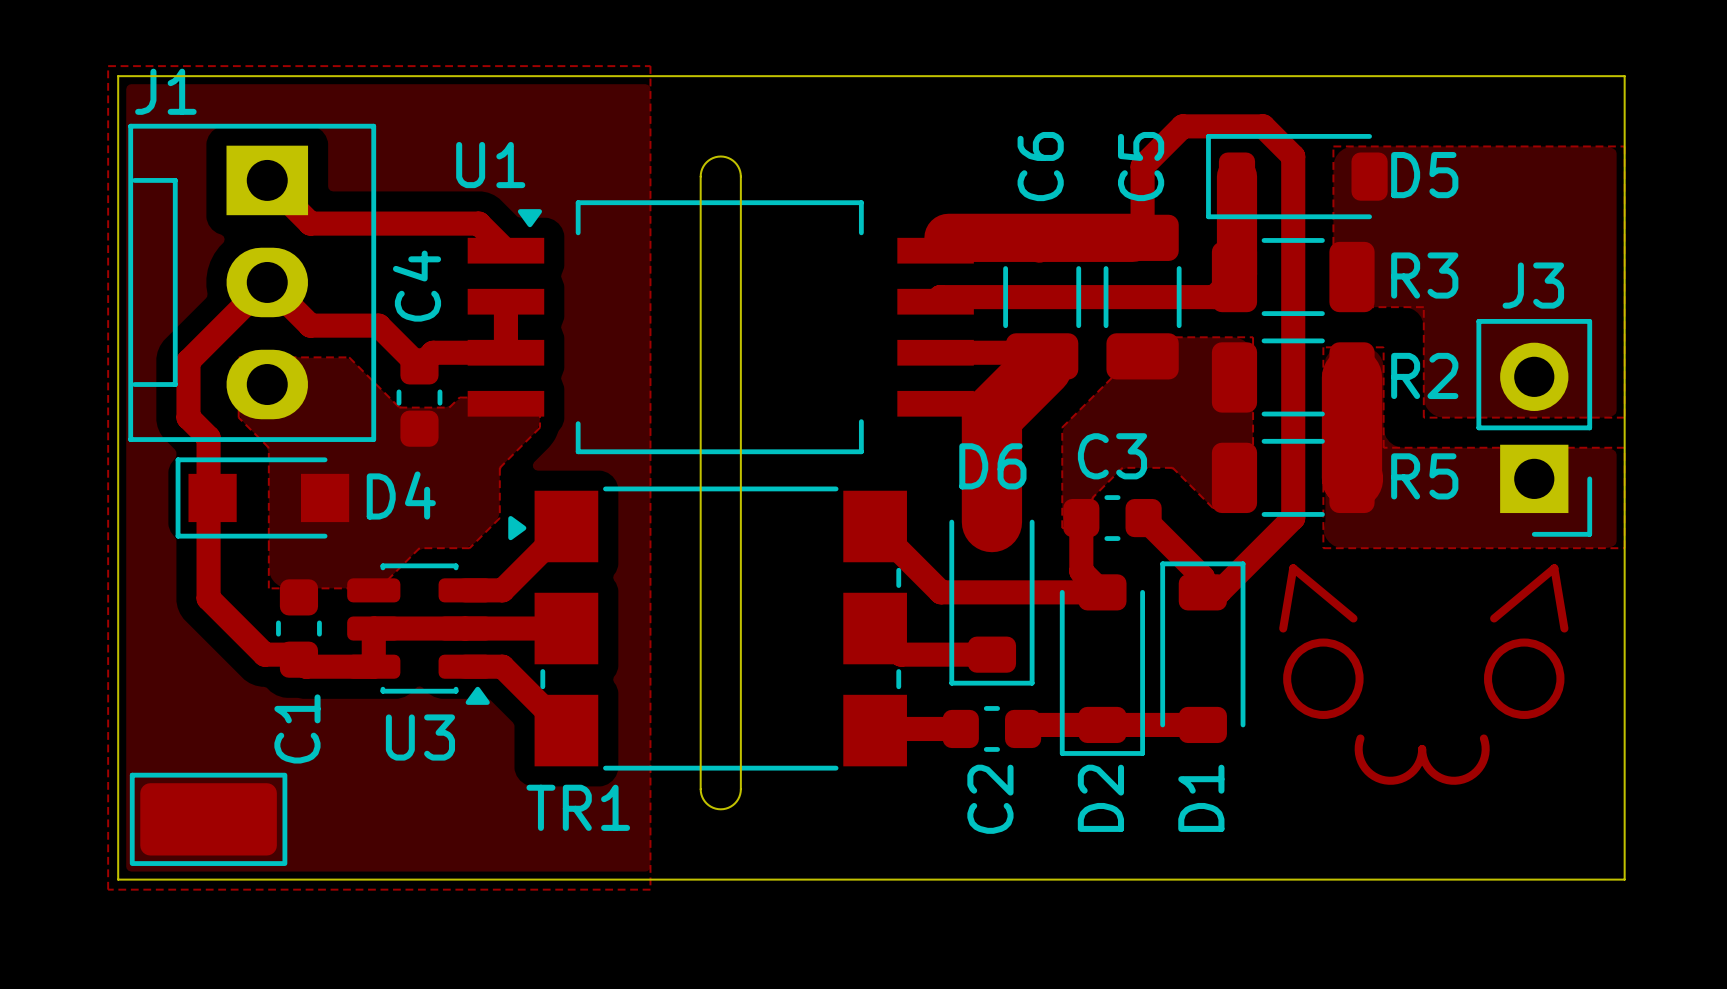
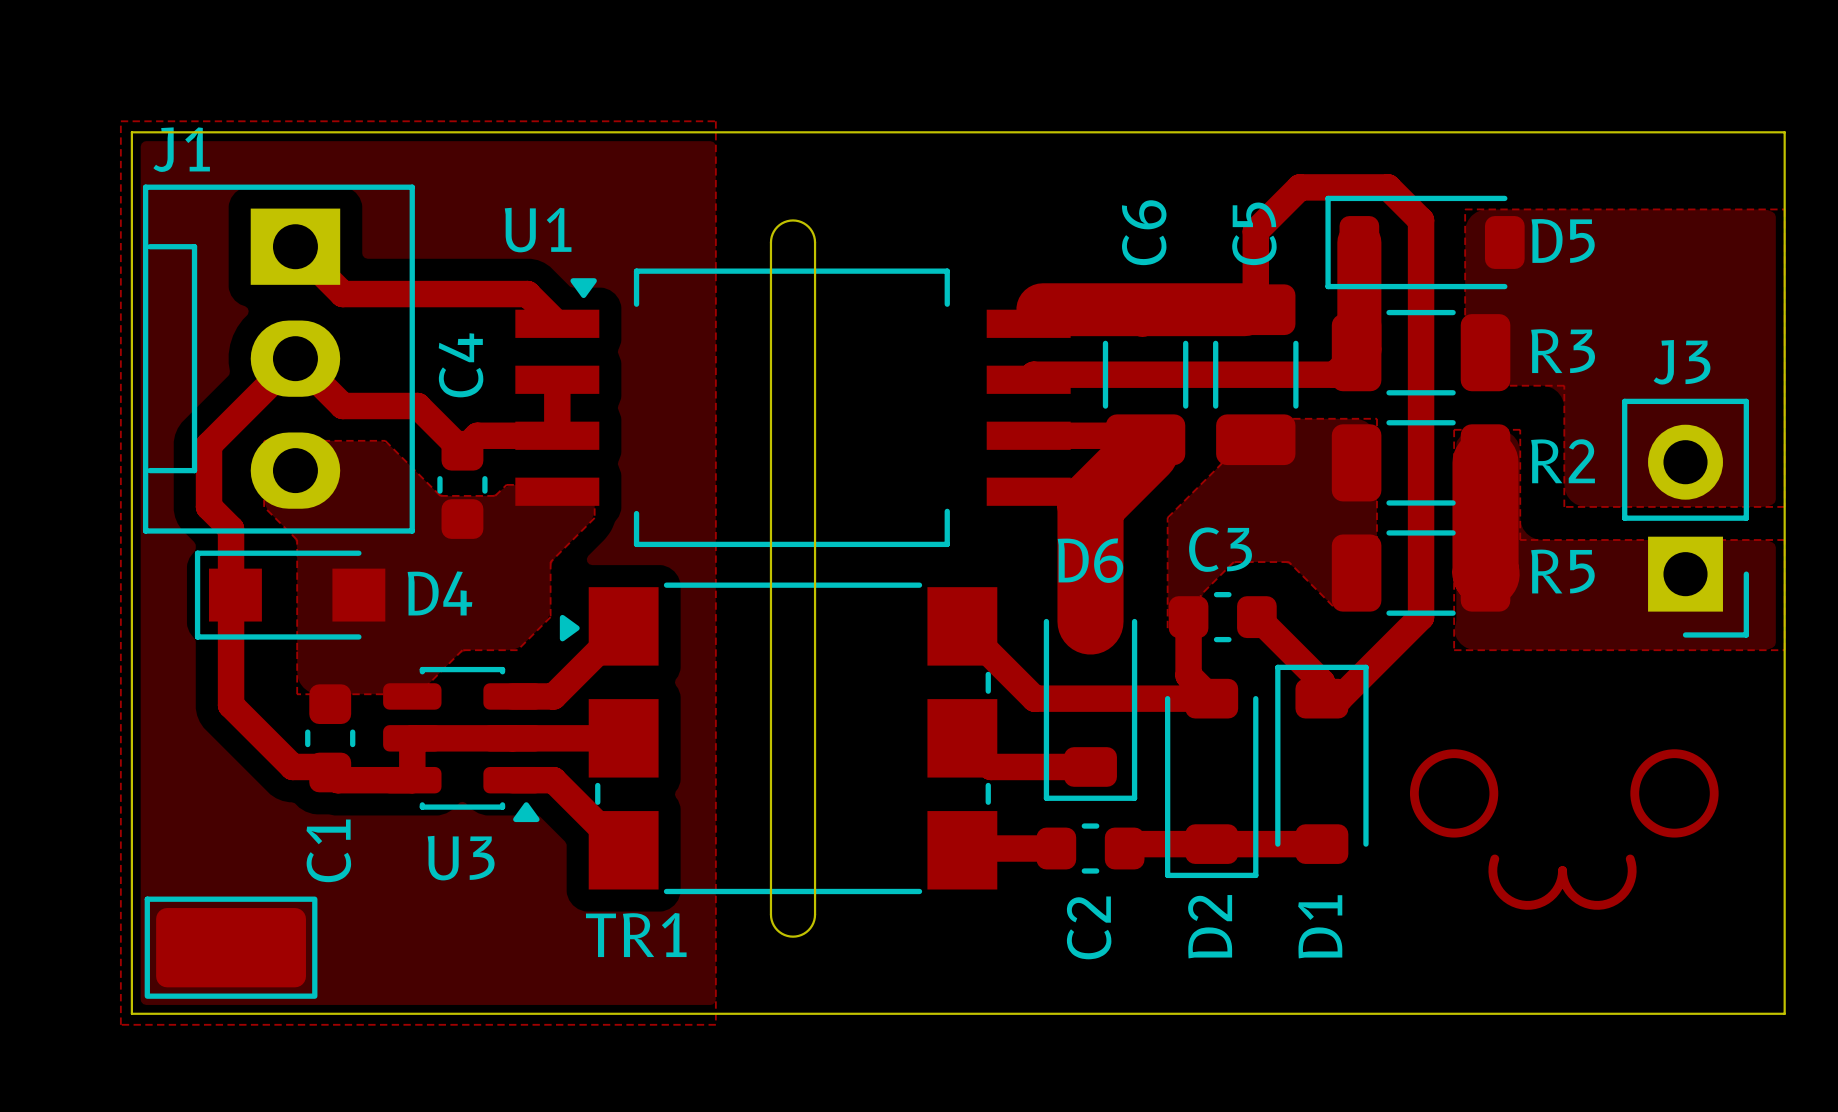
top track: (1353, 618) (1293, 568) (1283, 628) -> none
top track: (1494, 618) (1554, 568) (1564, 628) -> none

